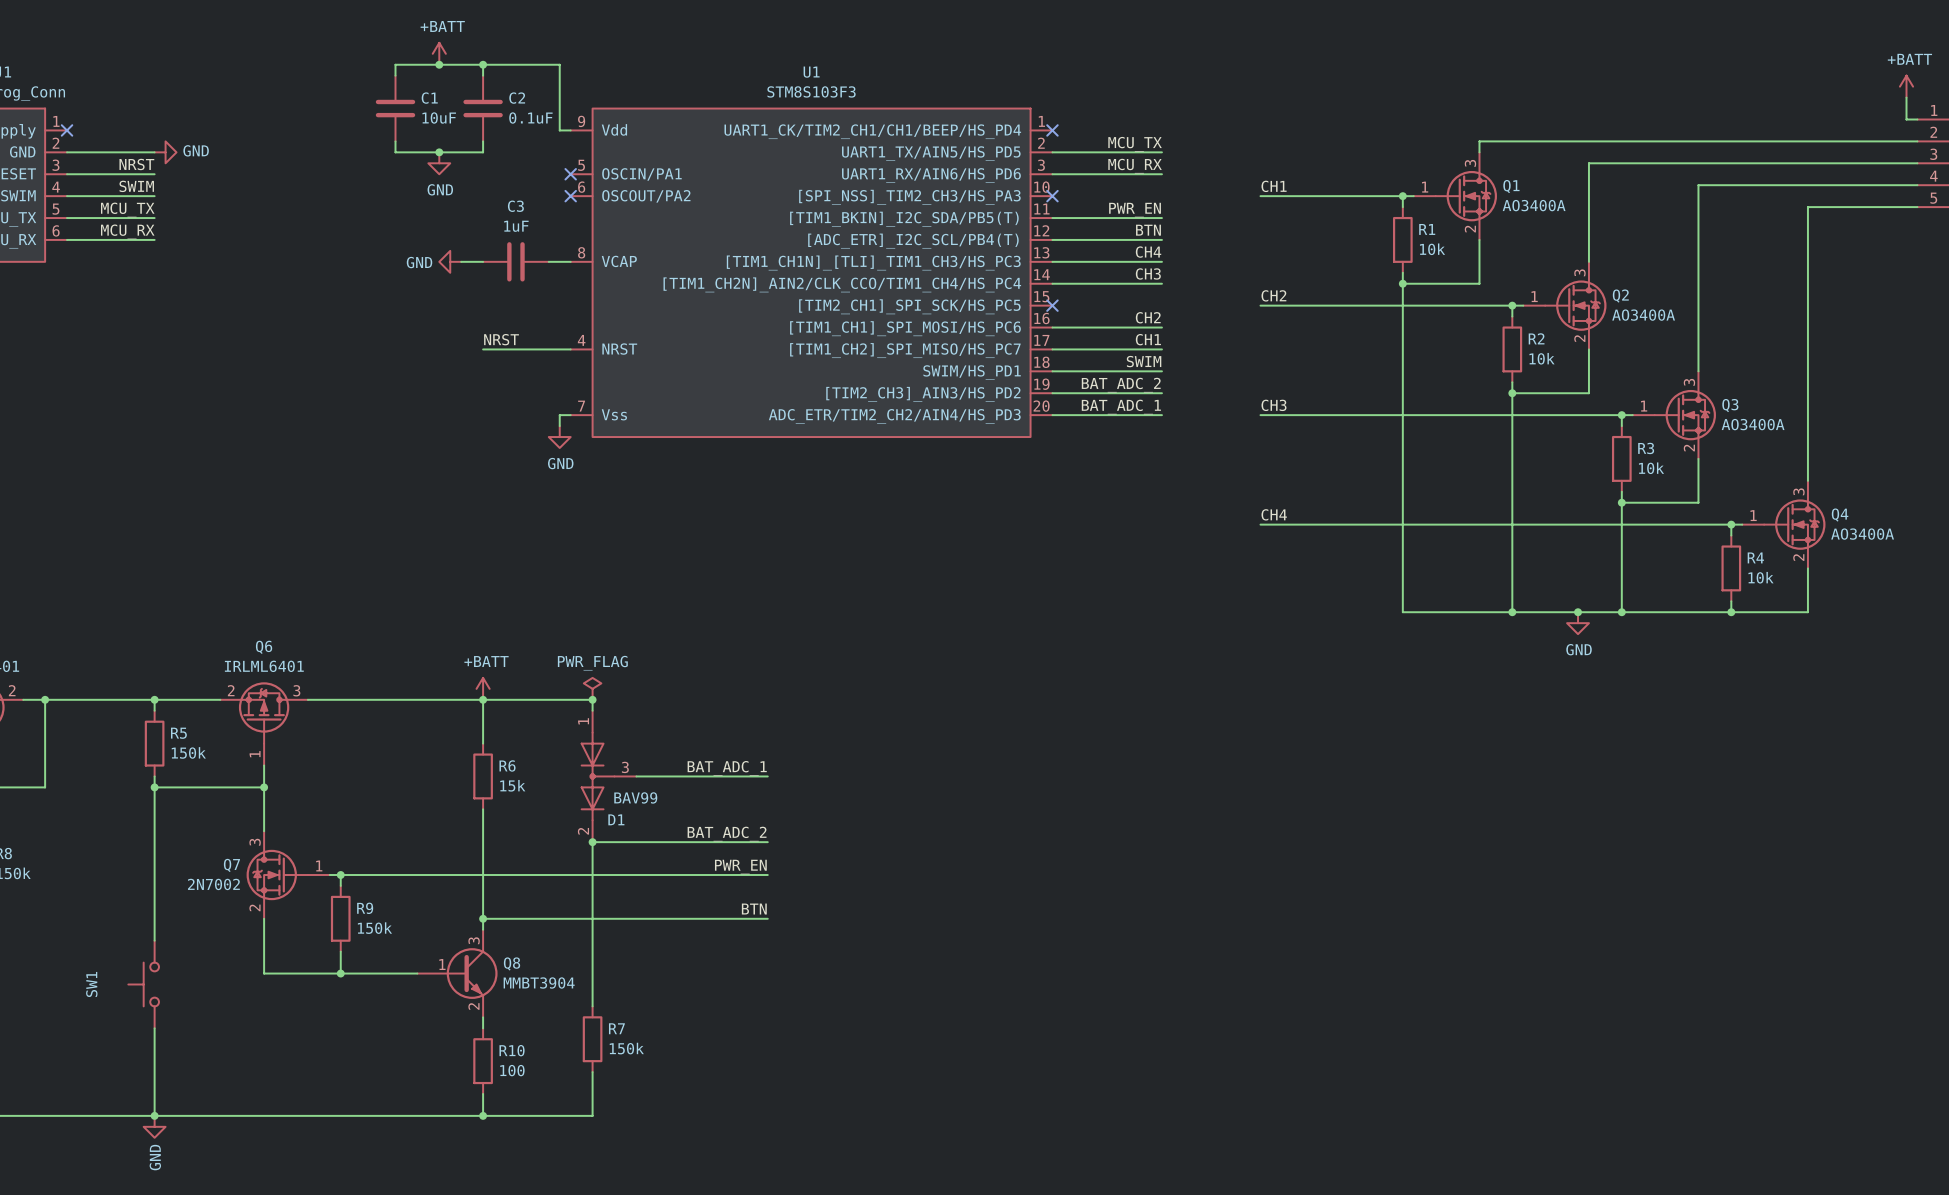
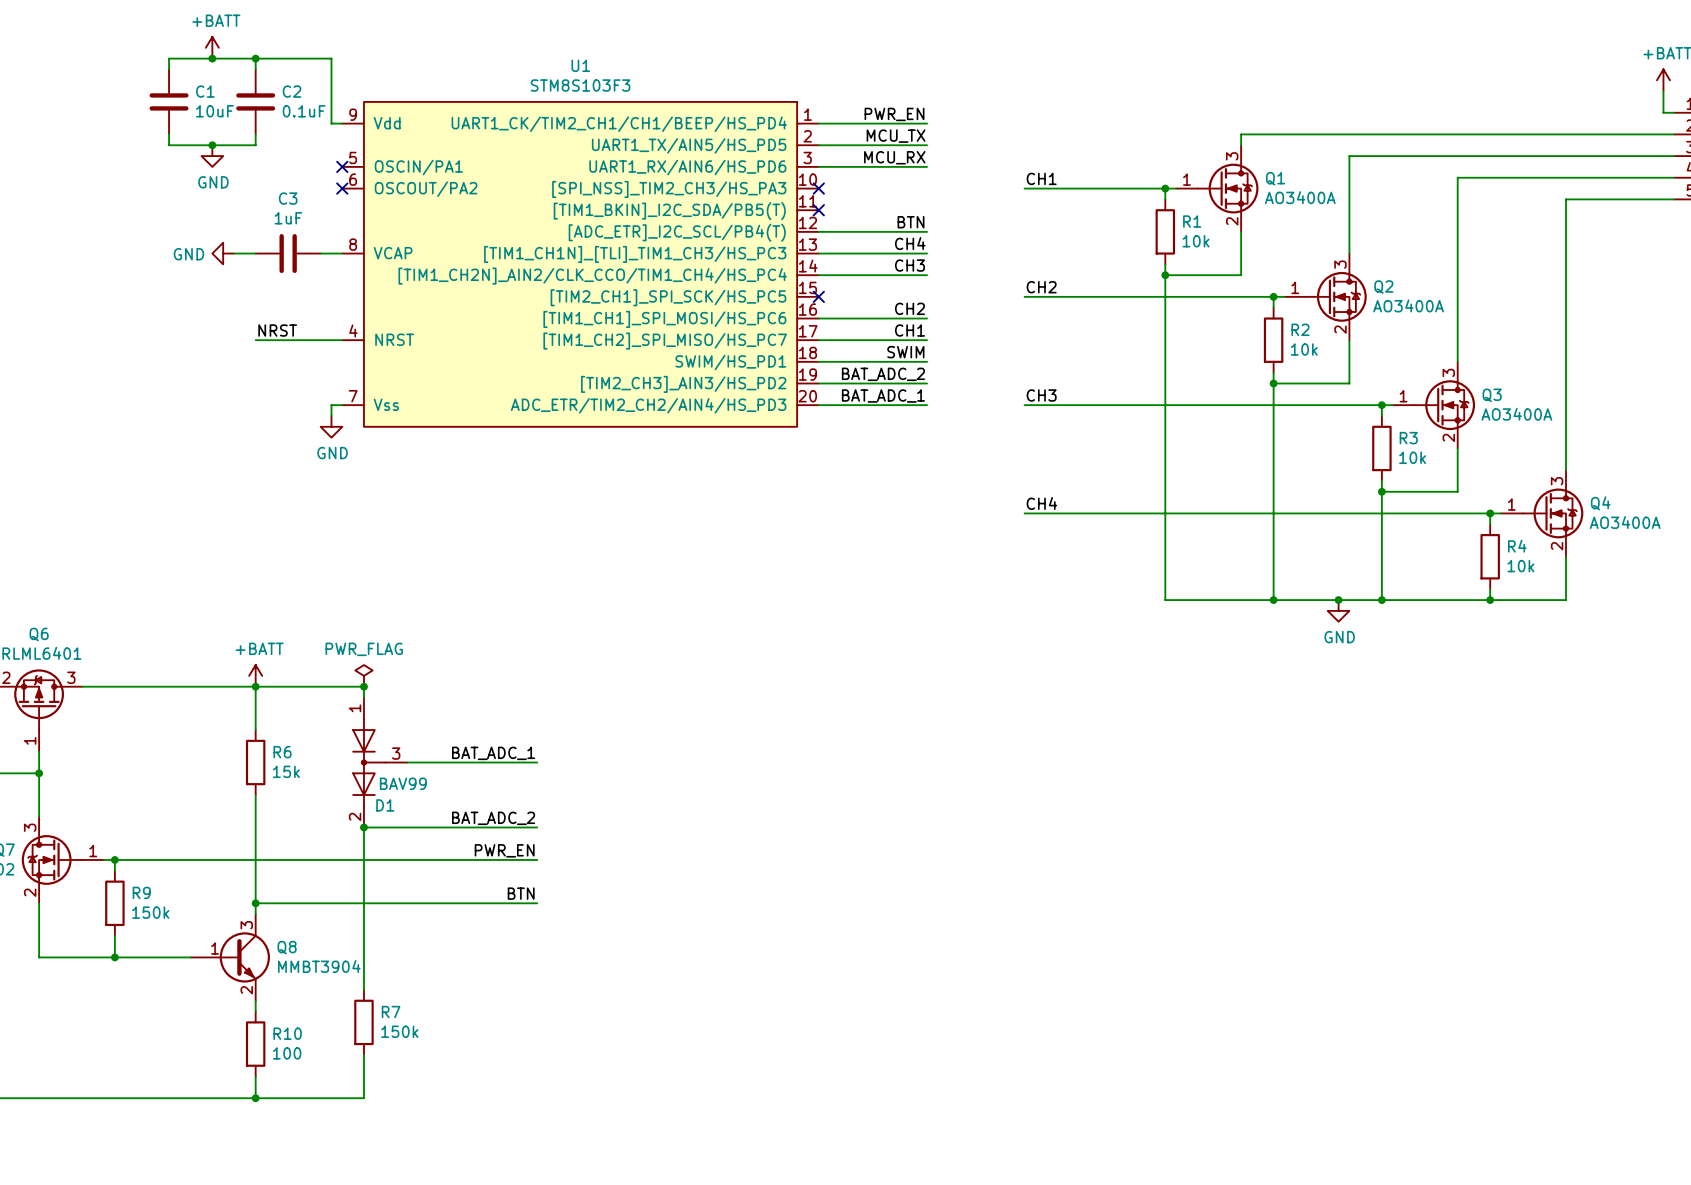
no-connect mark: (1052, 130) -> none
label position: PWR_EN (1135, 210) -> PWR_EN (894, 114)
wire: (1052, 218) (1161, 218) -> (818, 123) (927, 123)
no-connect mark: none -> (818, 210)

